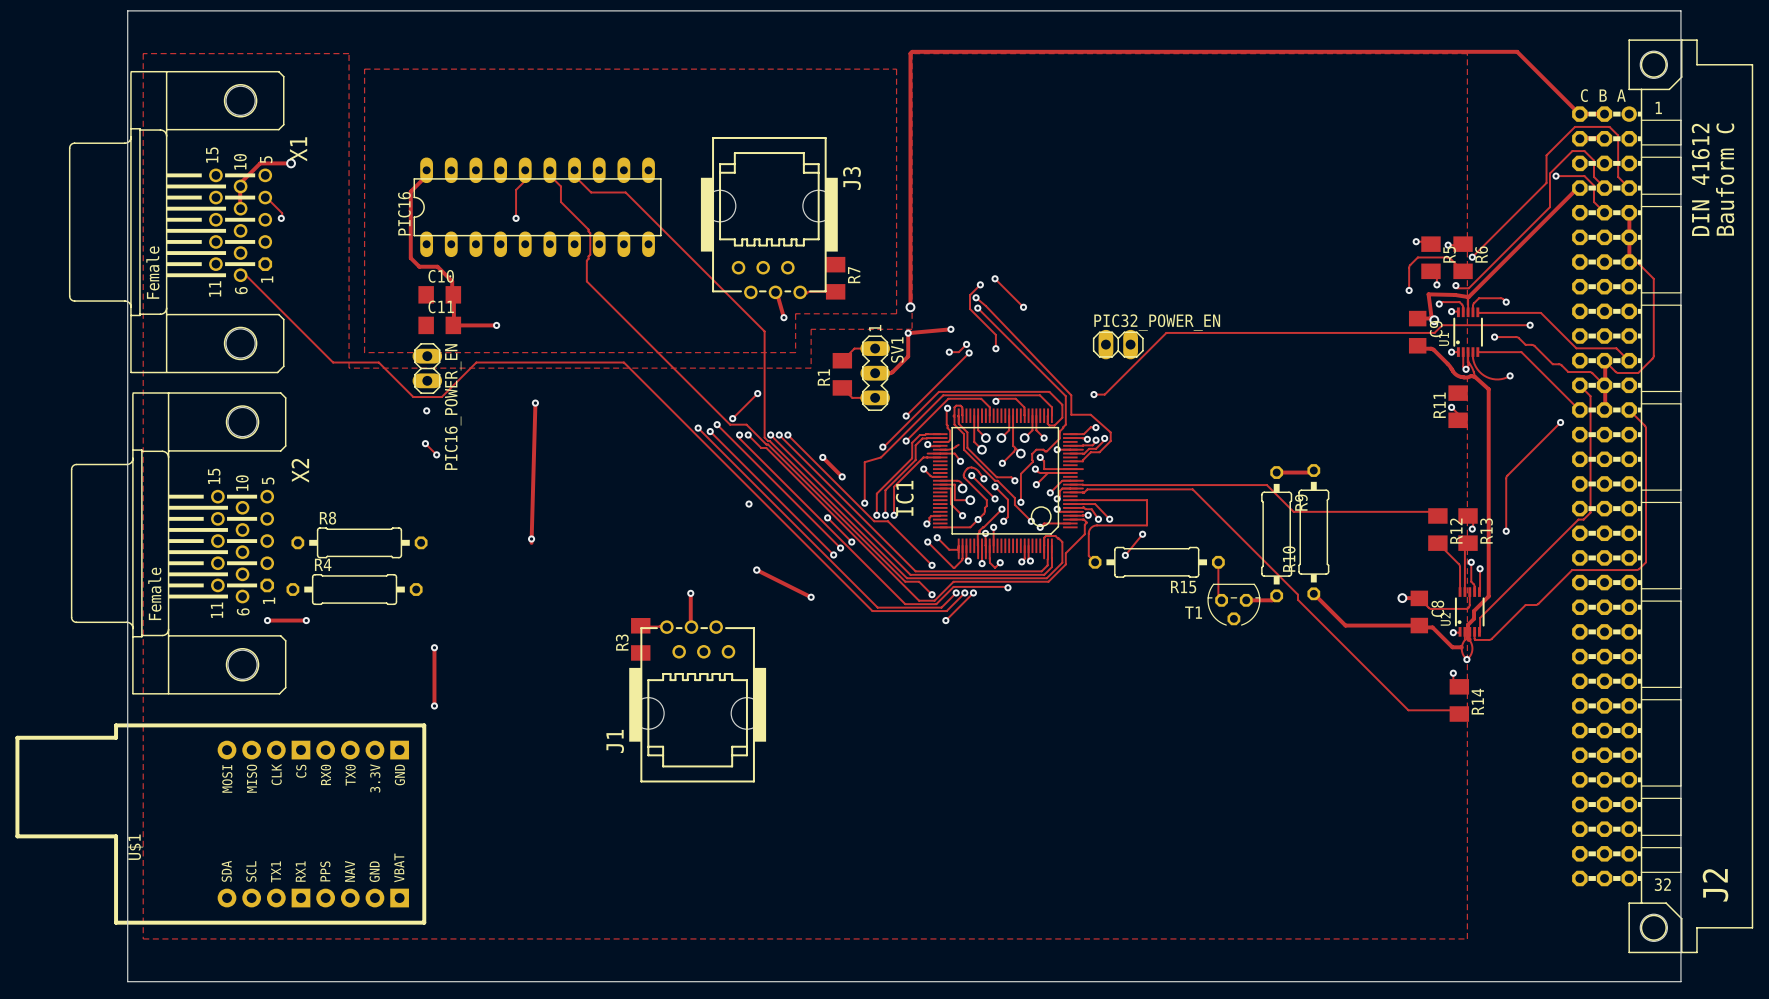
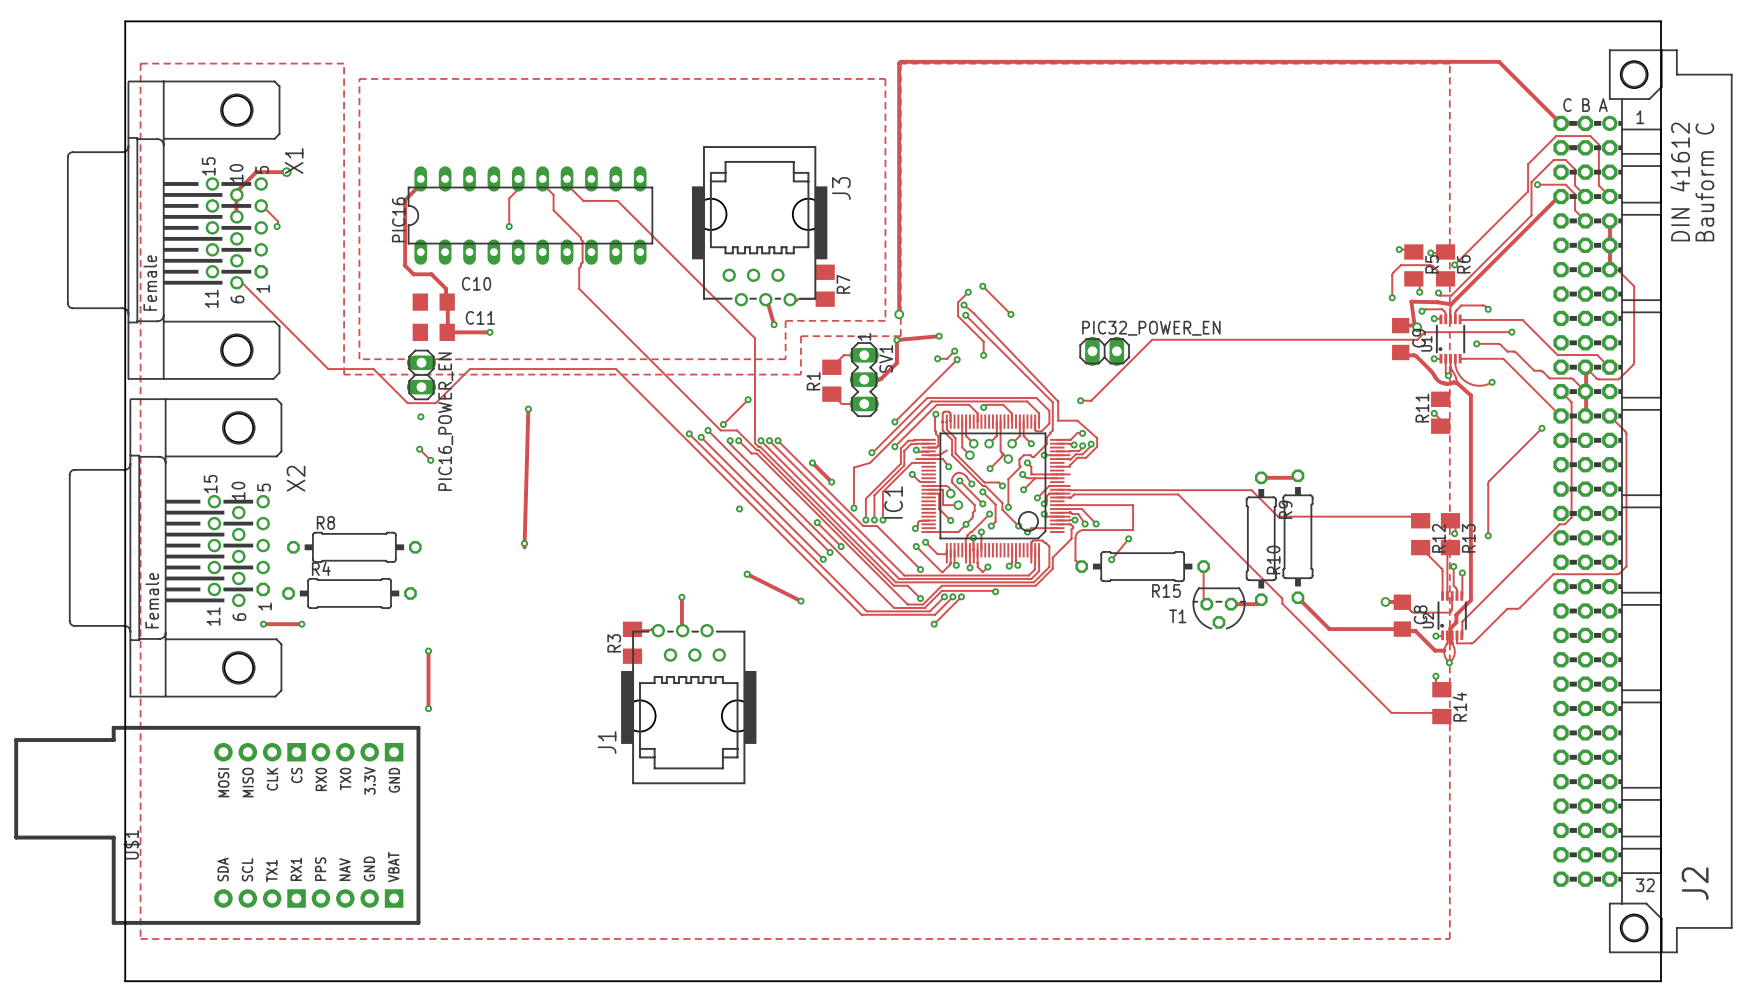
C10 name position: C10 (441, 276) -> C10 (476, 283)
C11 name position: C11 (441, 306) -> C11 (480, 317)

